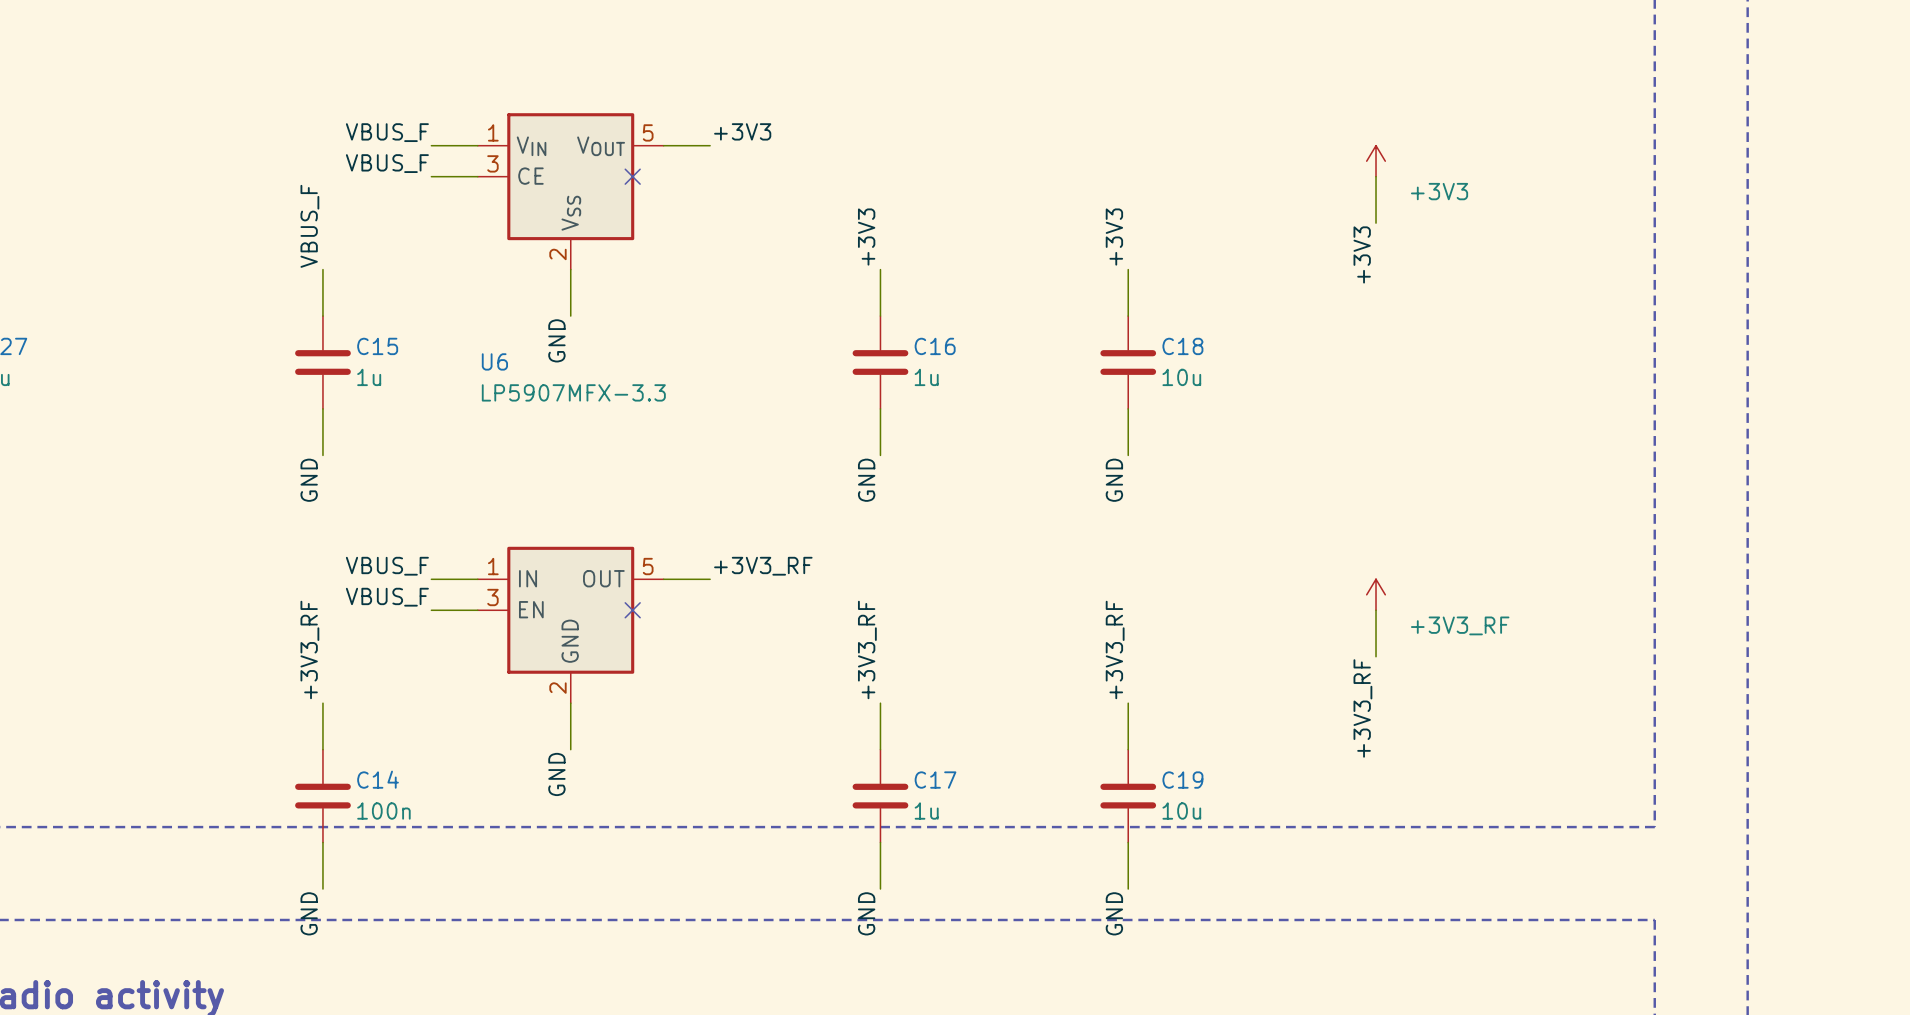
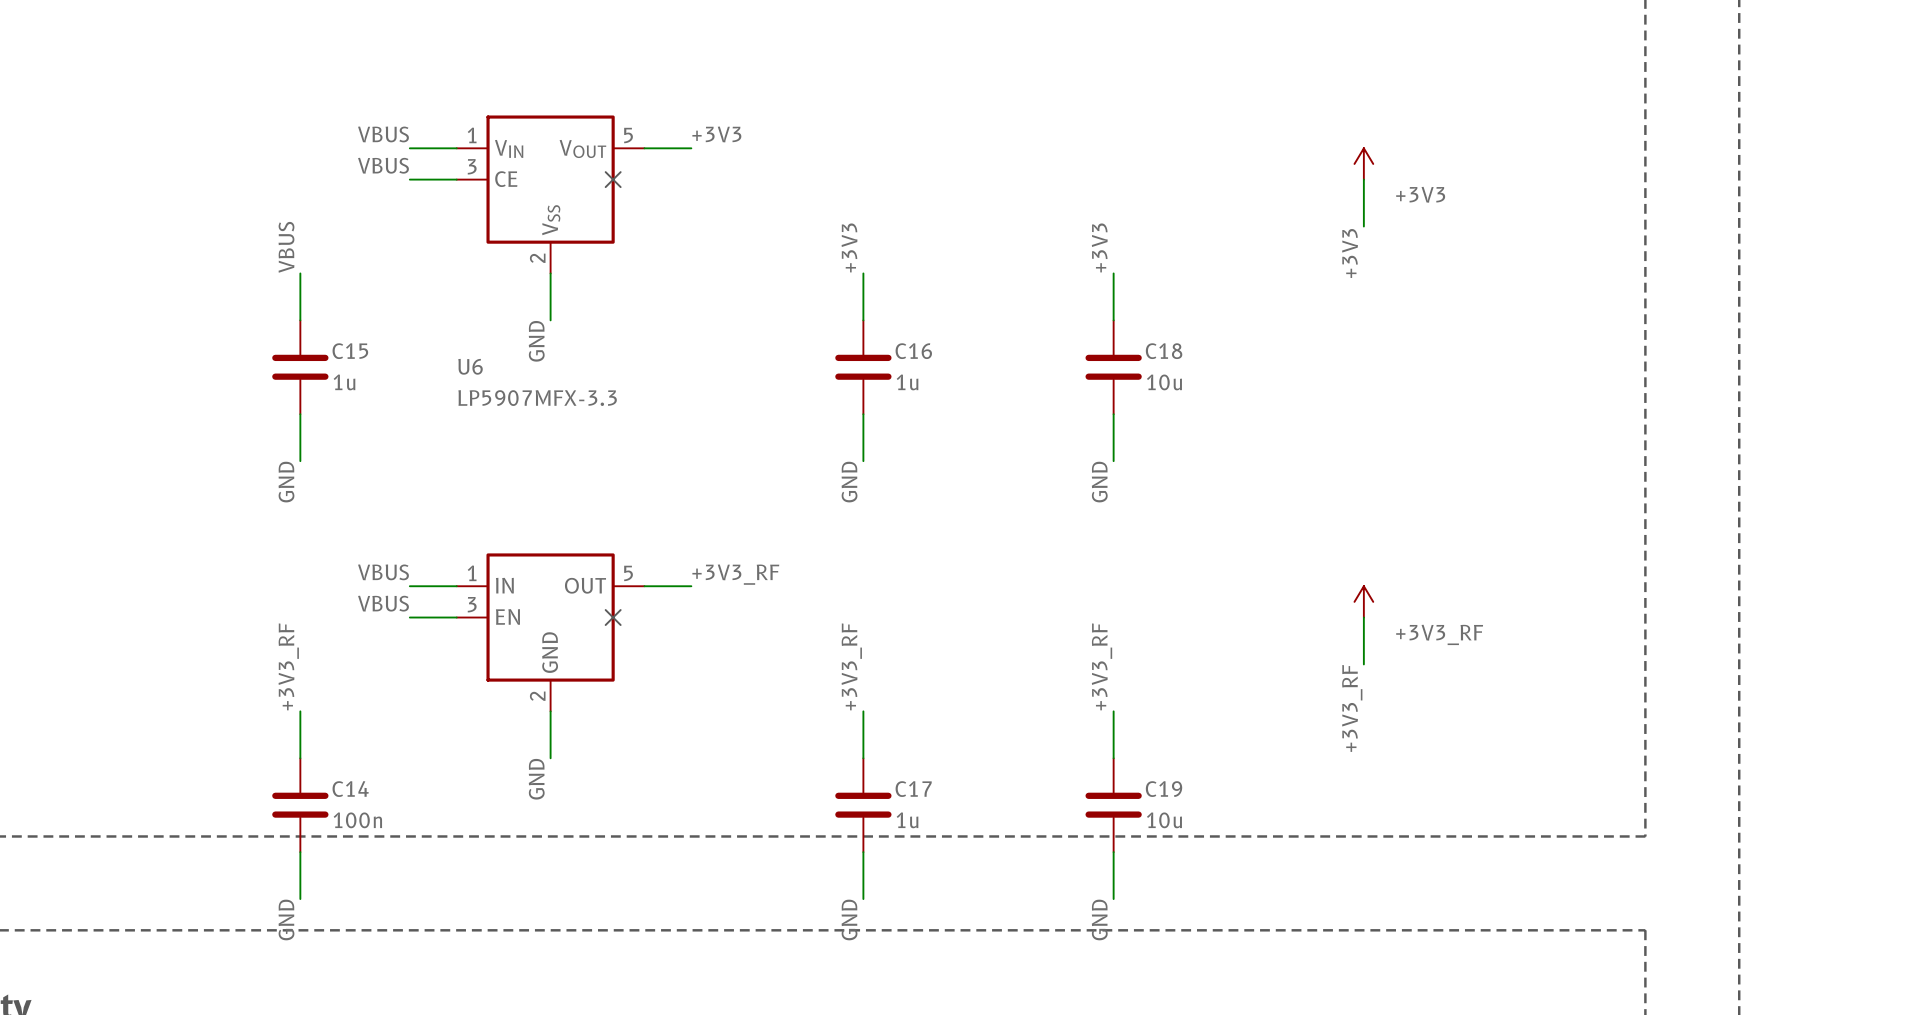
label: VBUS_F (387, 132) -> VBUS (383, 134)
label: VBUS_F (387, 163) -> VBUS (383, 165)
label: VBUS_F (309, 226) -> VBUS (286, 247)
label: VBUS_F (387, 566) -> VBUS (383, 572)
label: VBUS_F (387, 597) -> VBUS (383, 603)

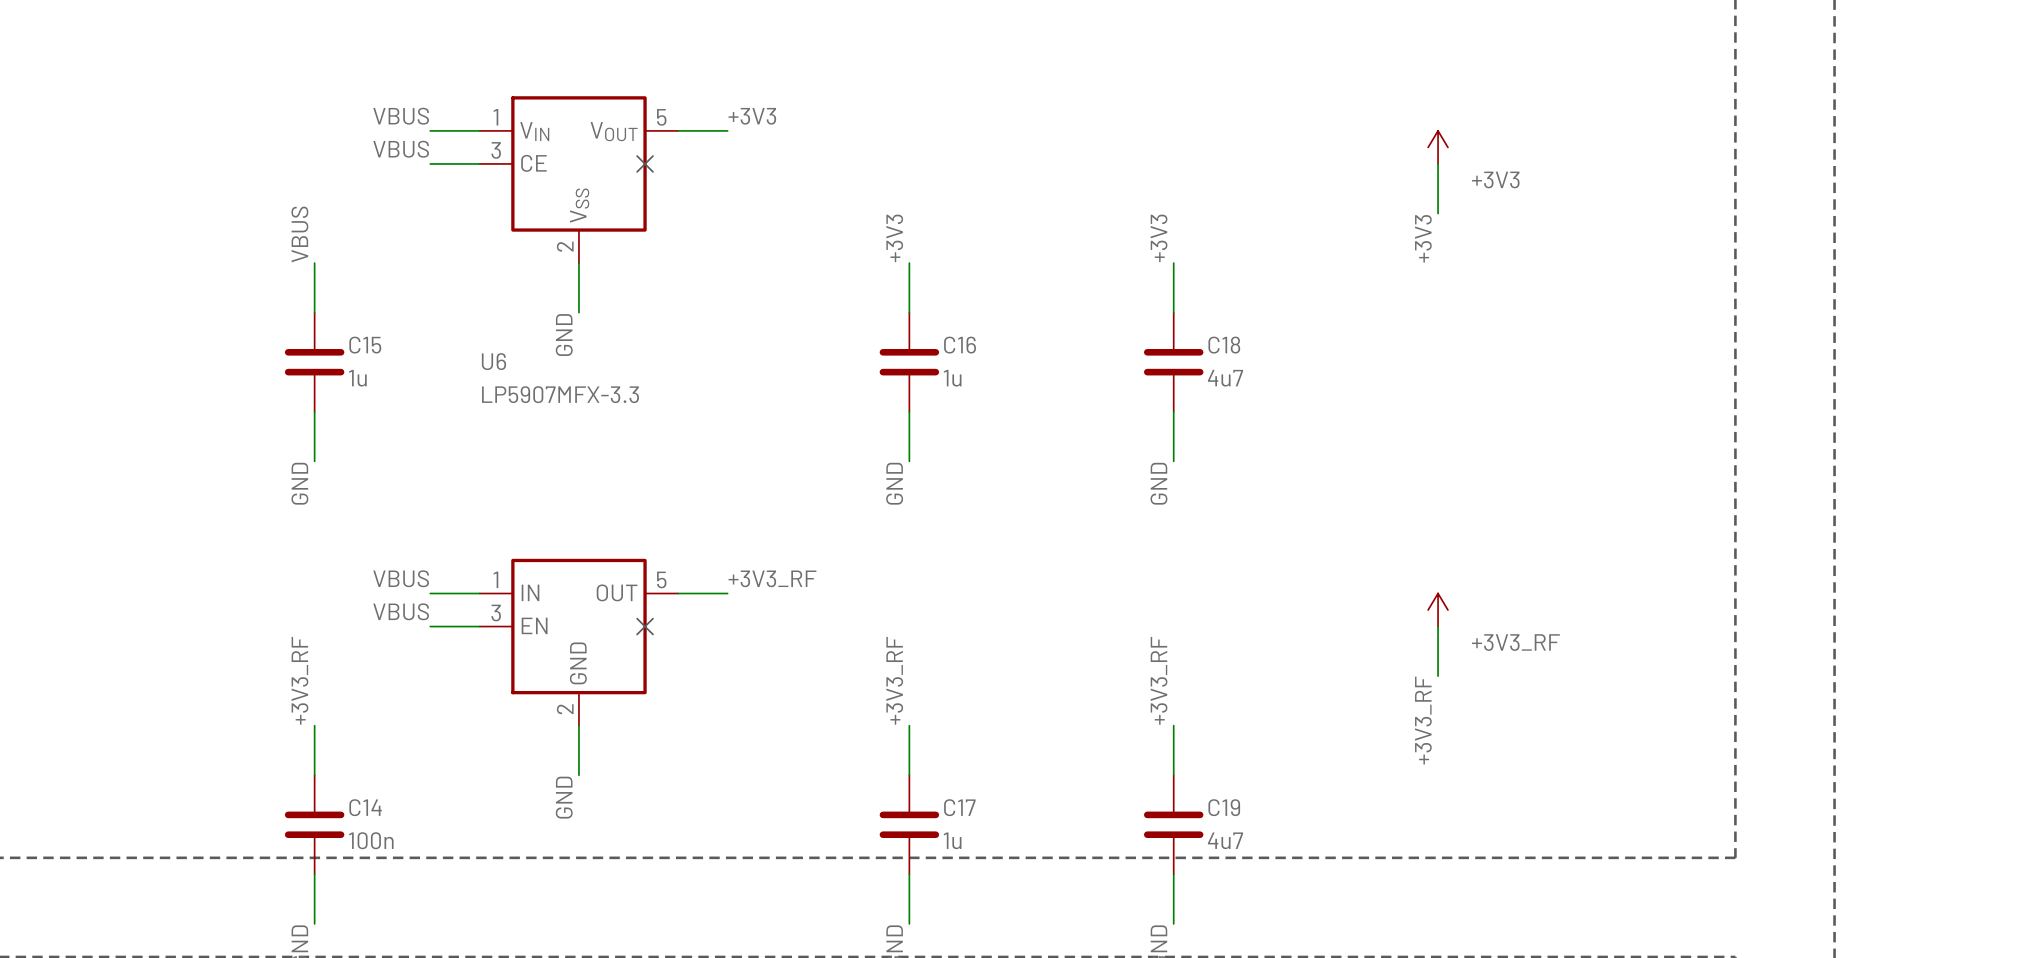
C18 value: 10u (1164, 382) -> 4u7 (1225, 378)
C19 value: 10u (1164, 820) -> 4u7 (1225, 840)

